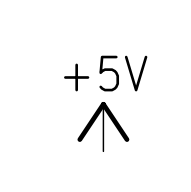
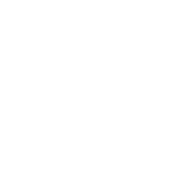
power symbol: +5V (103, 126) -> none

